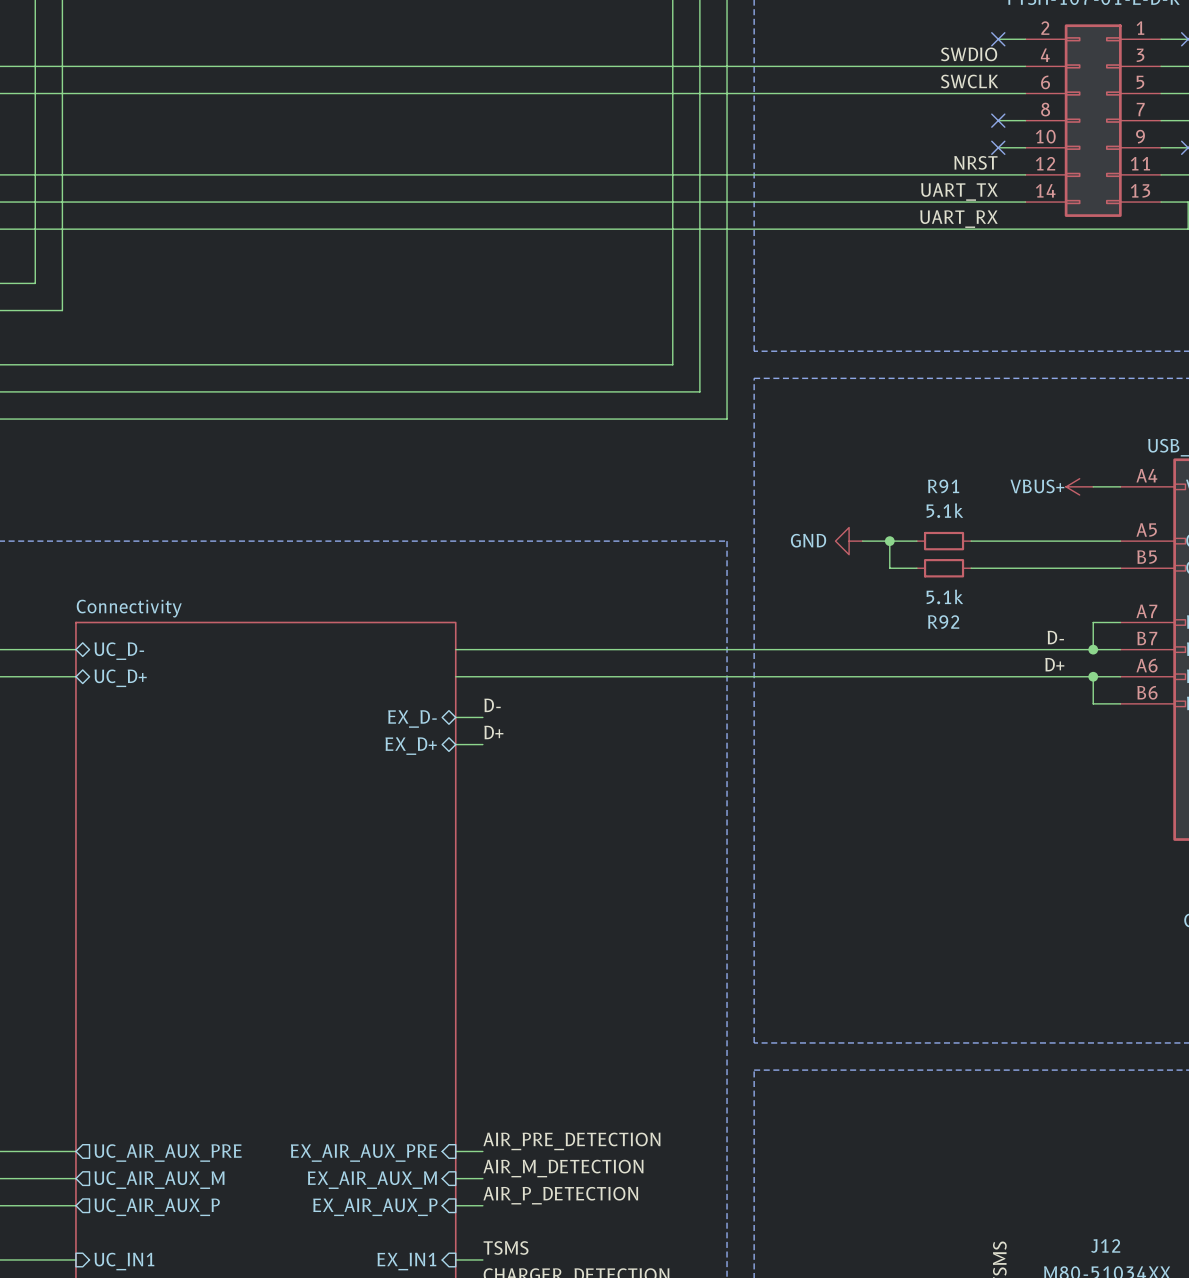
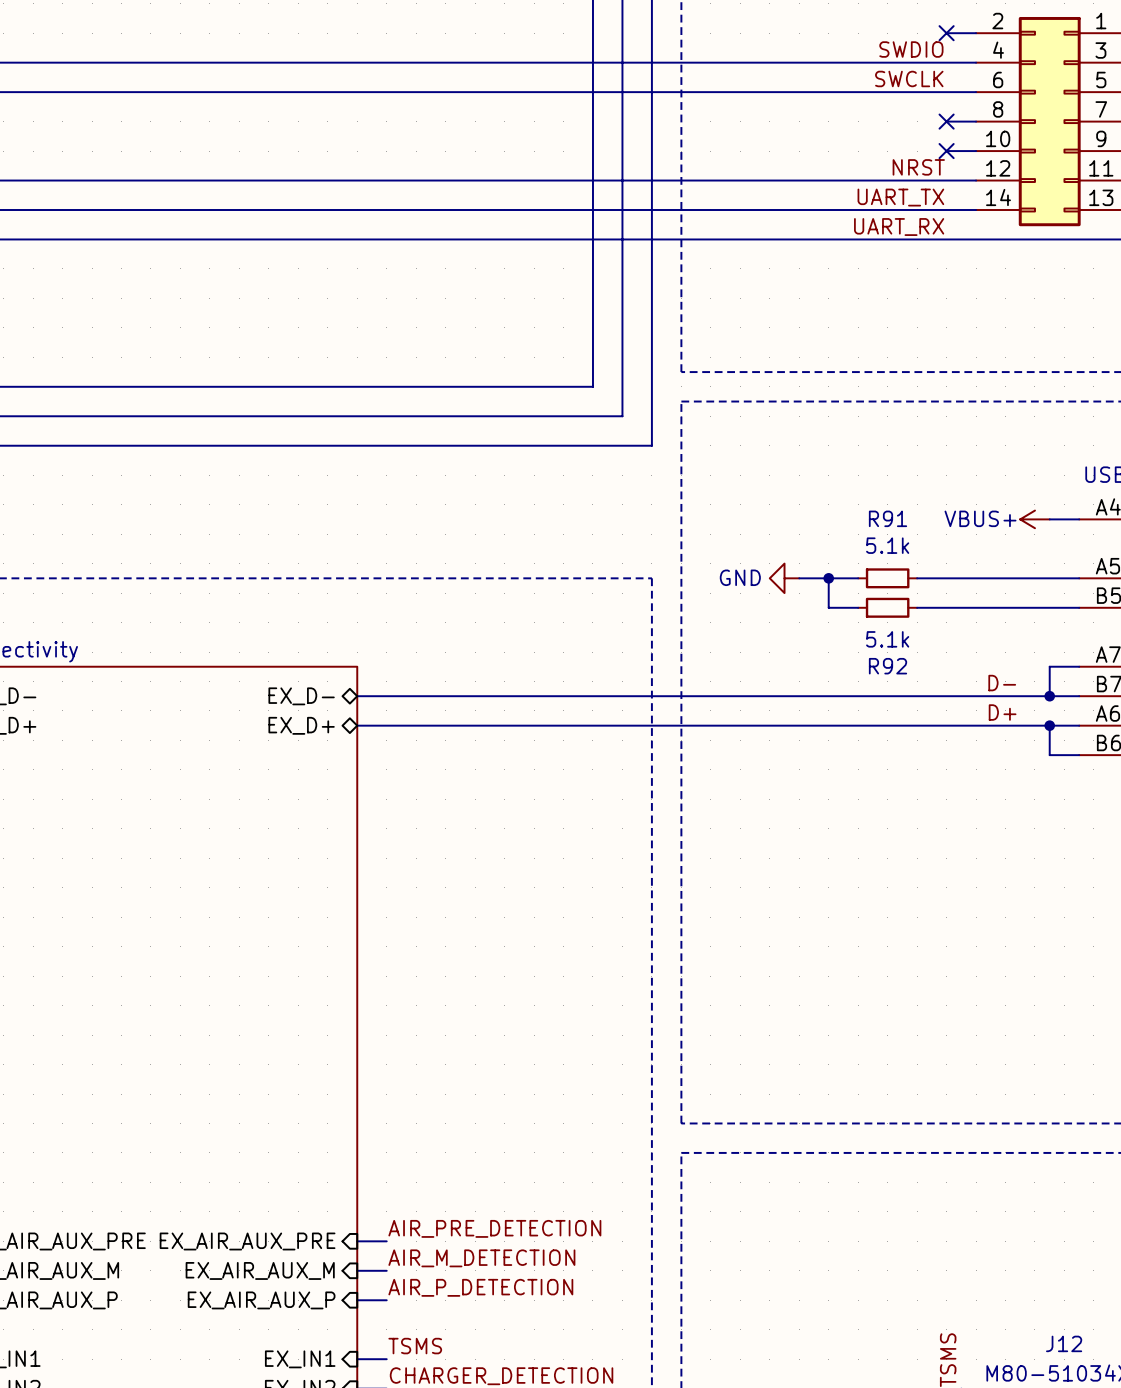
label: D- (492, 705) -> none
wire: (455, 717) (482, 717) -> none
sheet pin position: EX_D- (412, 718) -> EX_D- (301, 696)
label: D+ (493, 732) -> none
wire: (455, 744) (482, 744) -> none
sheet pin position: EX_D+ (411, 746) -> EX_D+ (301, 725)

